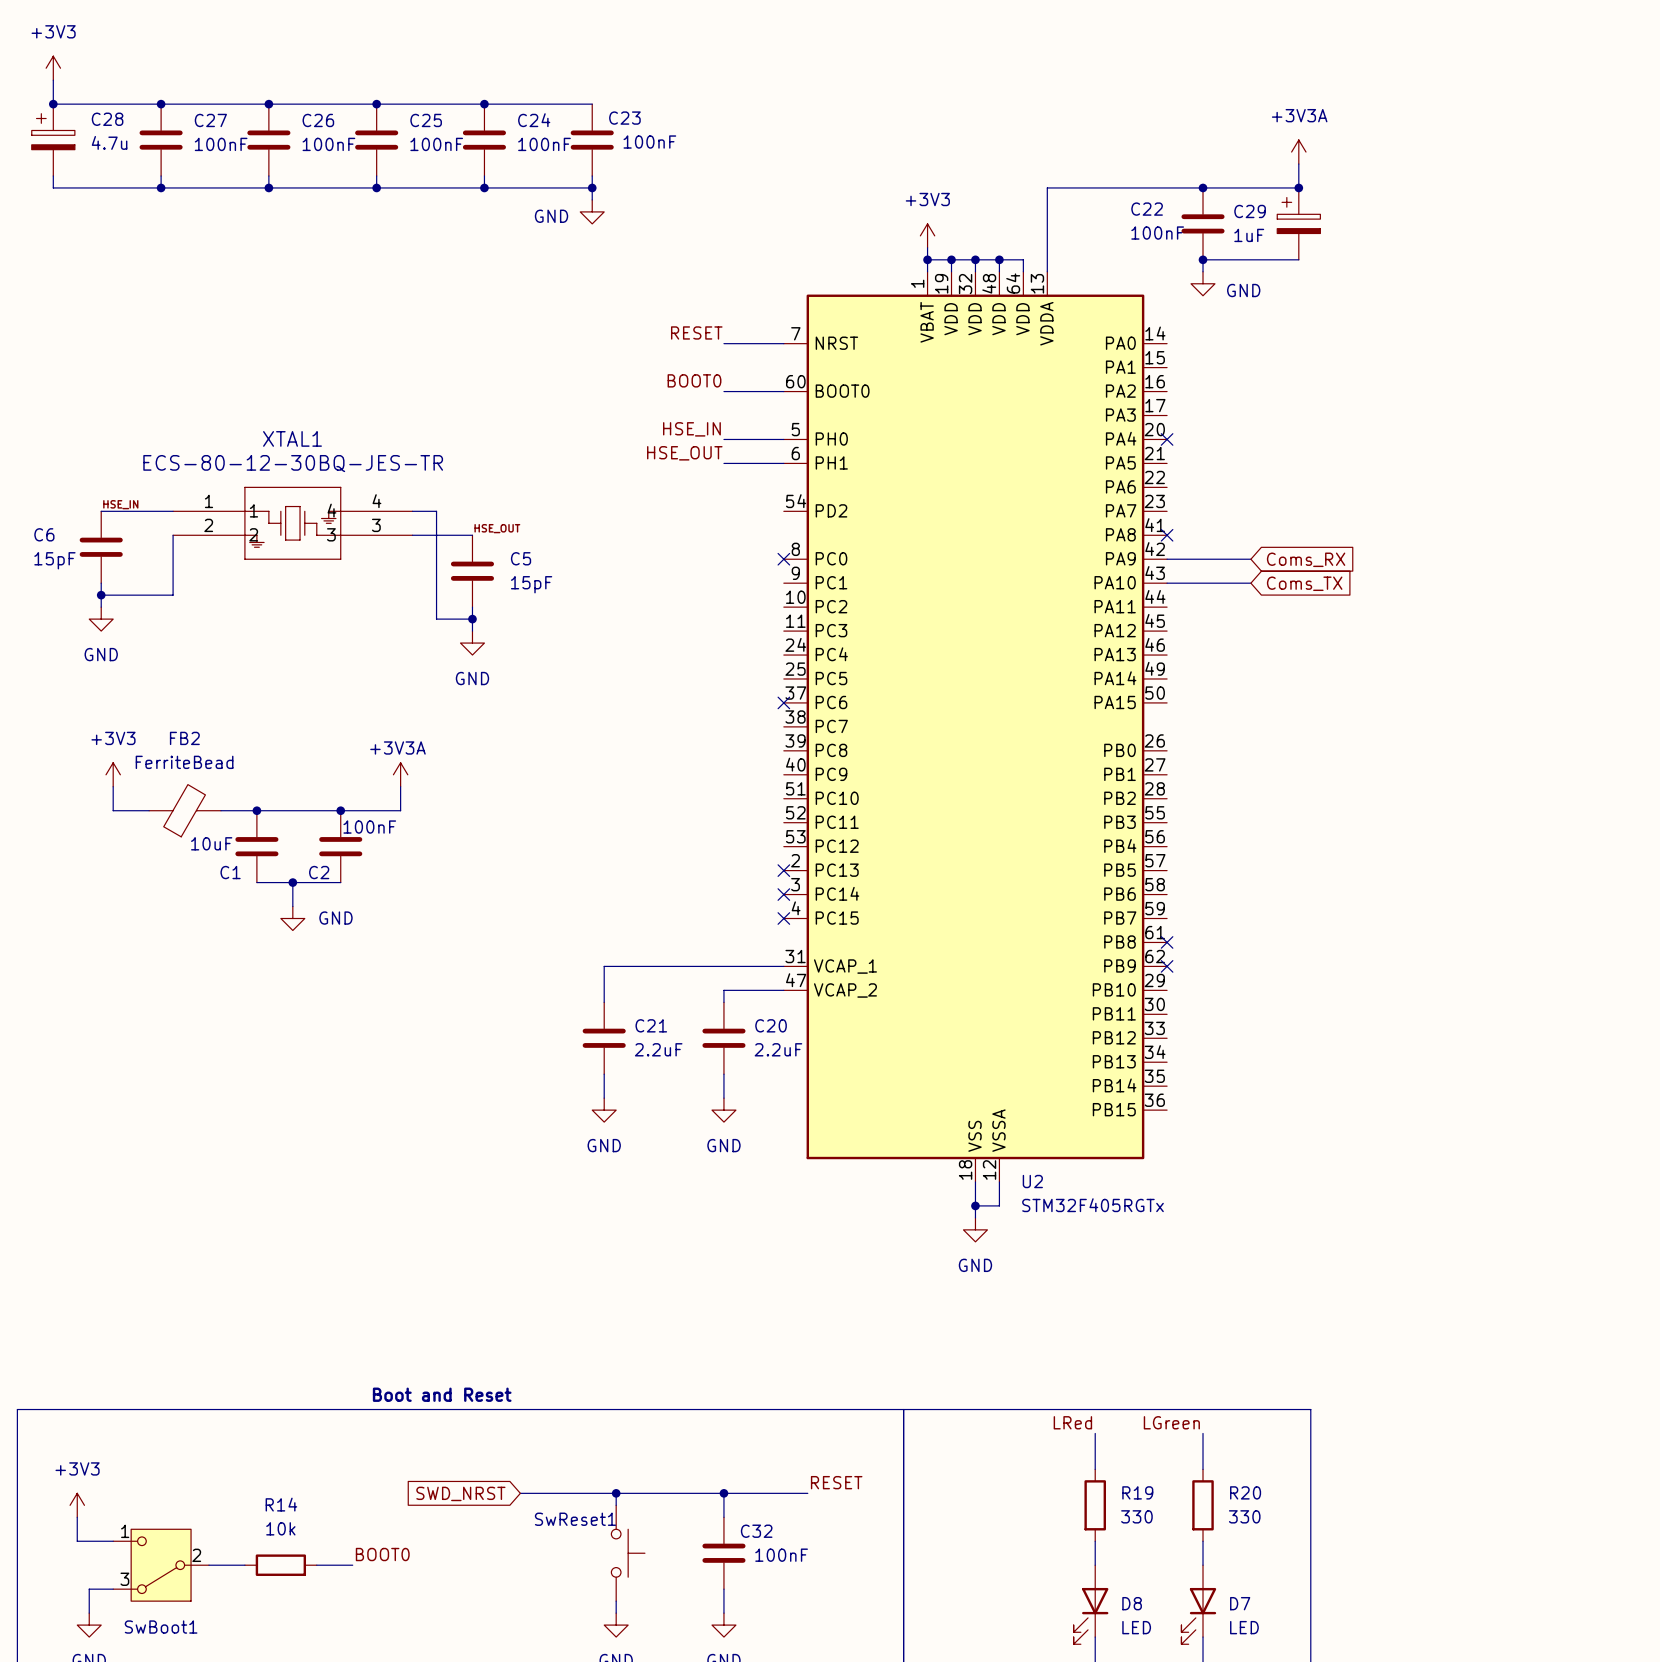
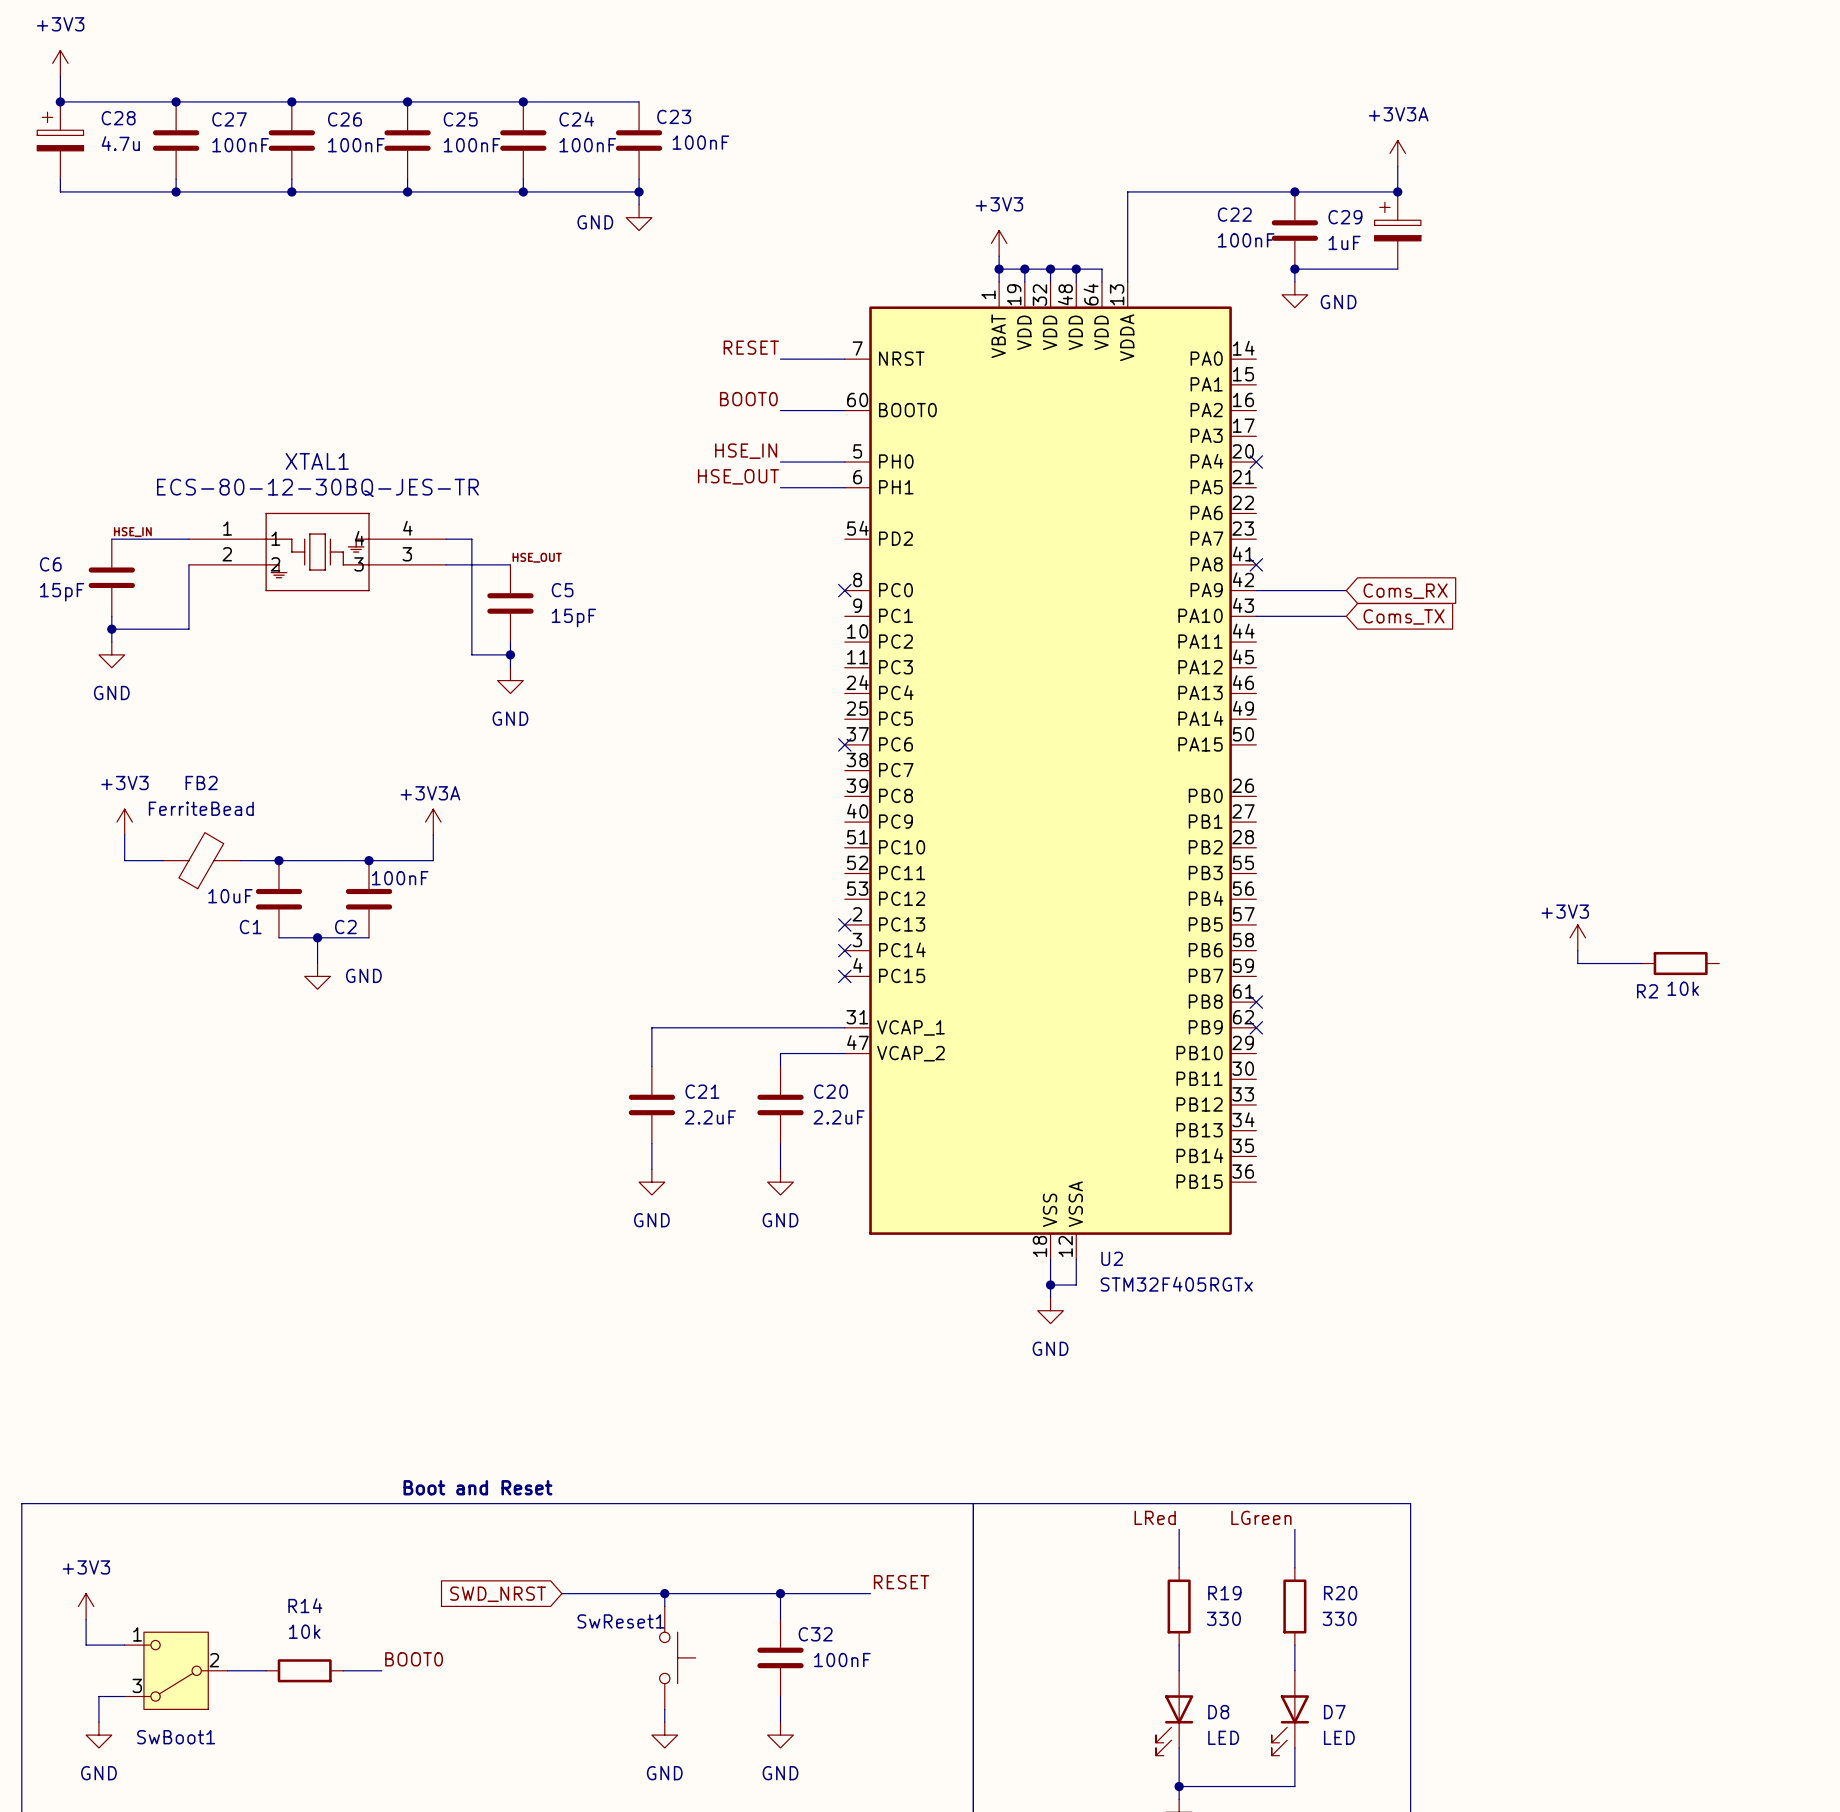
power symbol: none -> +3V3 (1577, 937)
wire: none -> (1577, 950) (1577, 963) (1642, 963)
R2: none -> 10k (1680, 963)

